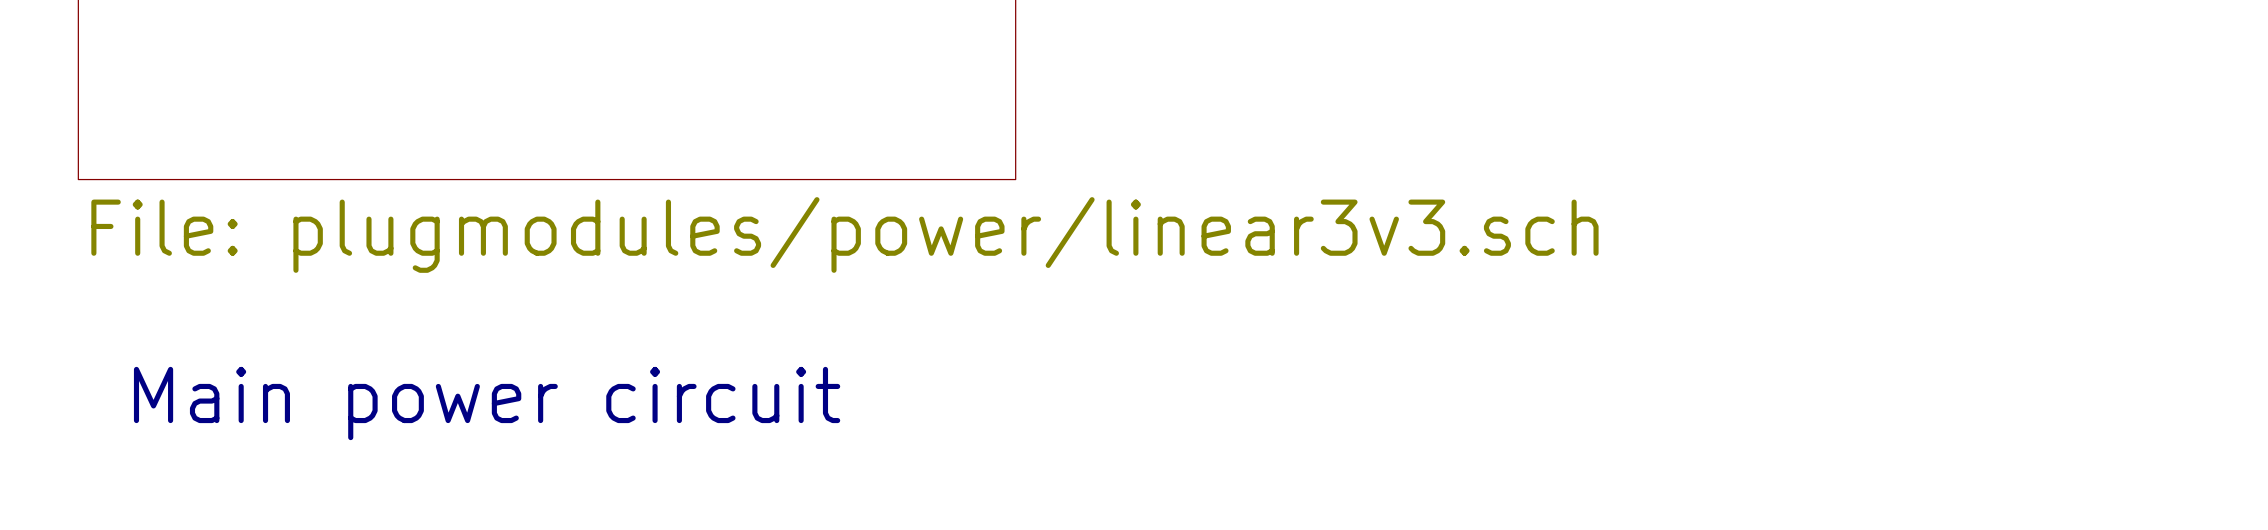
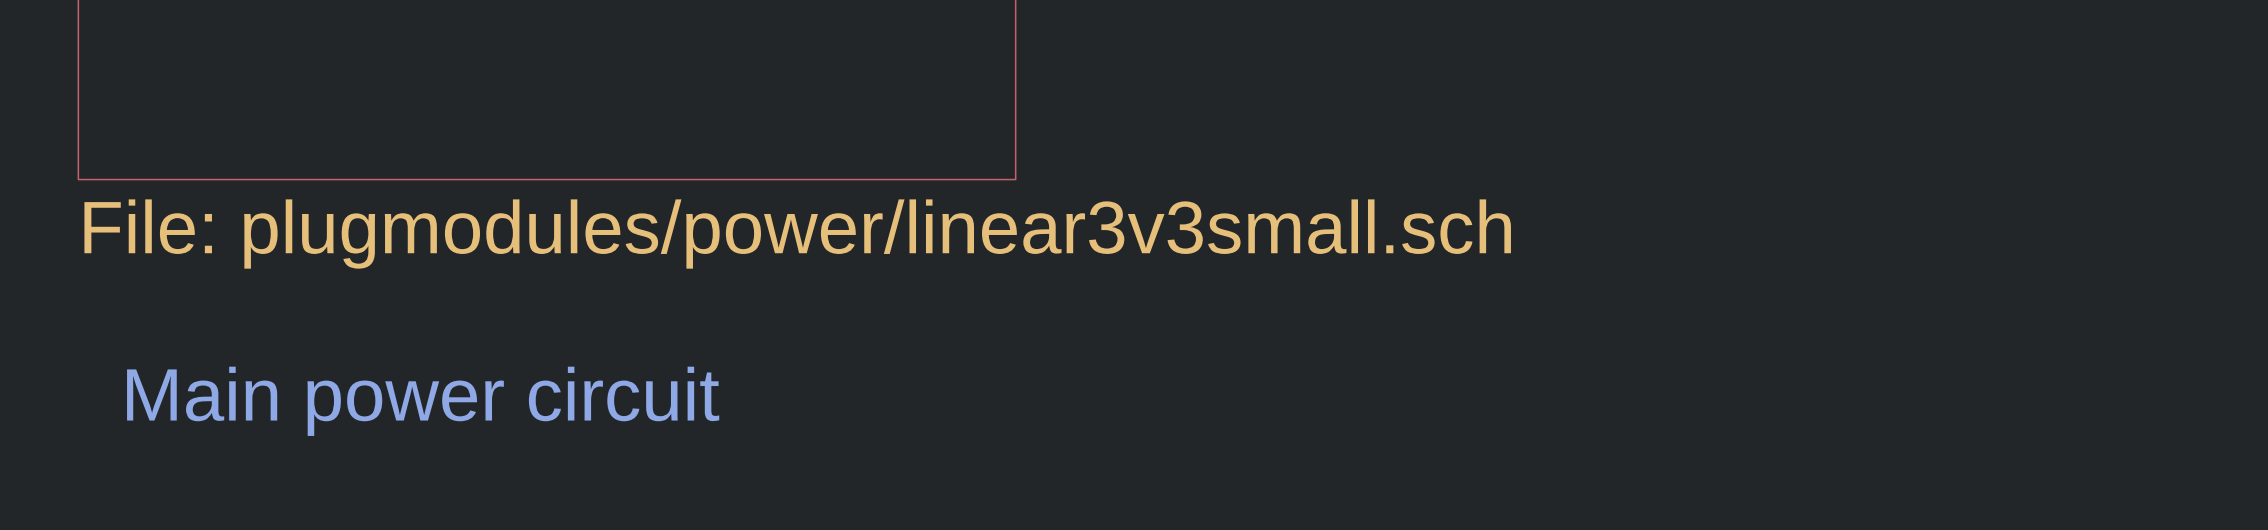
sheet value: File: plugmodules/power/linear3v3.sch (844, 234) -> File: plugmodules/power/linear3v3small.sch (797, 234)

